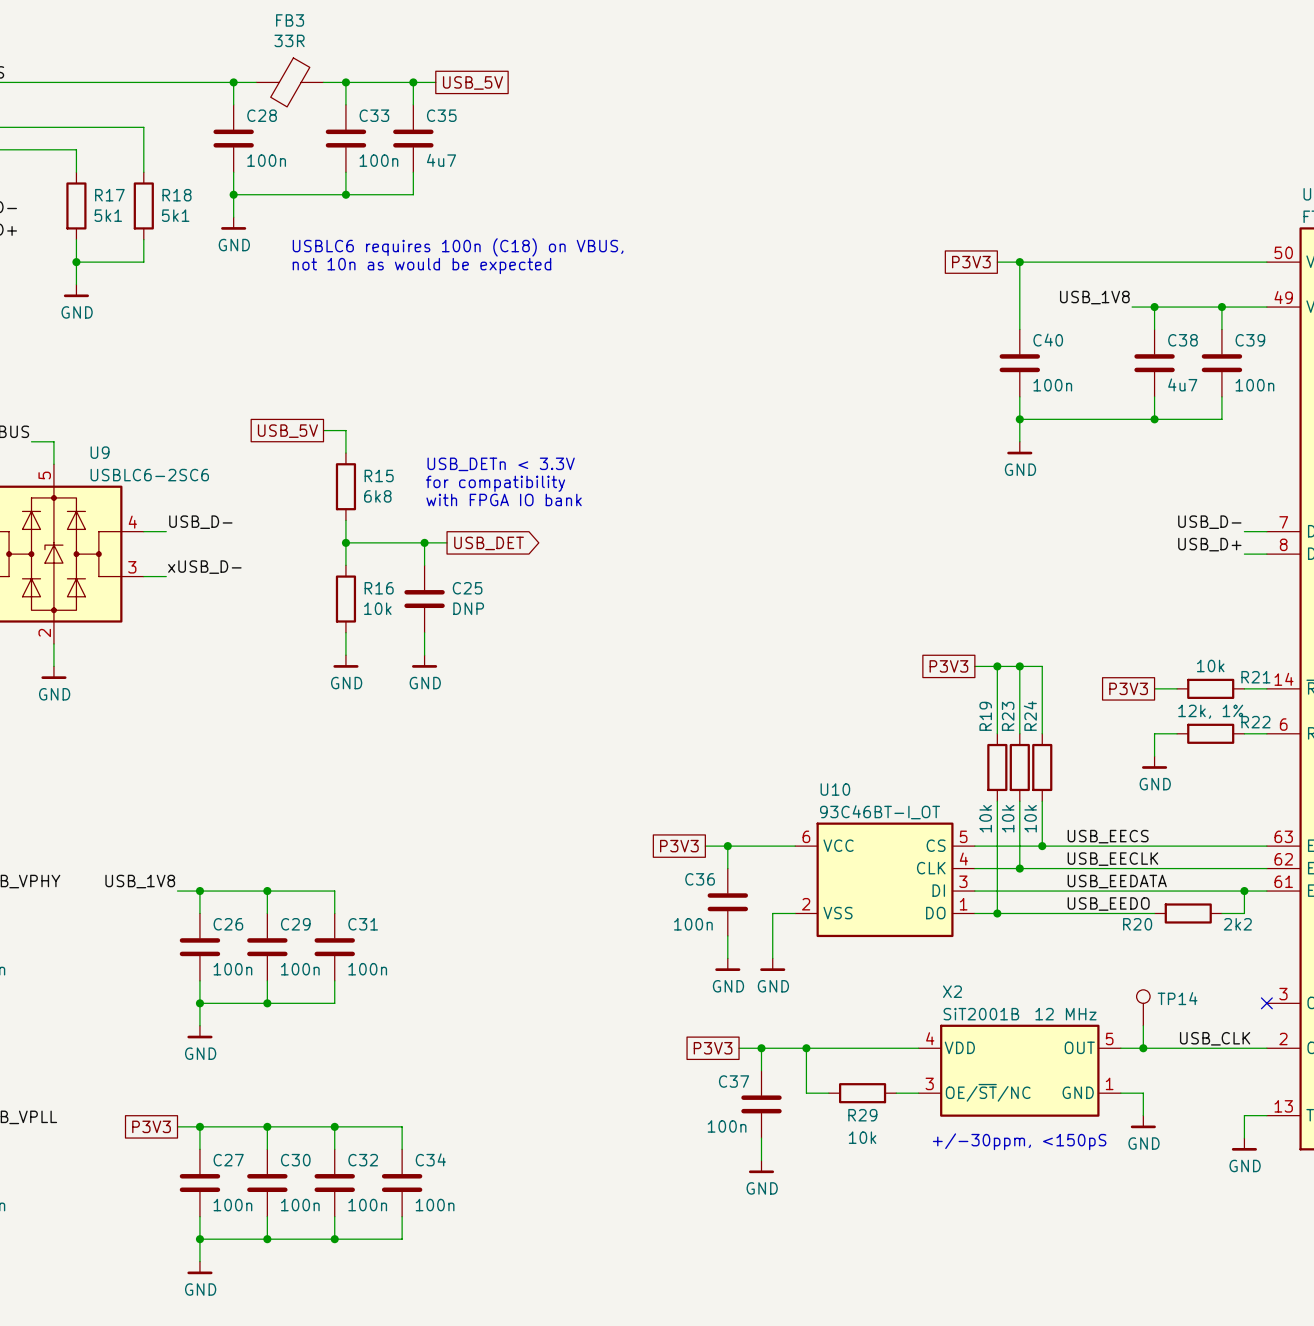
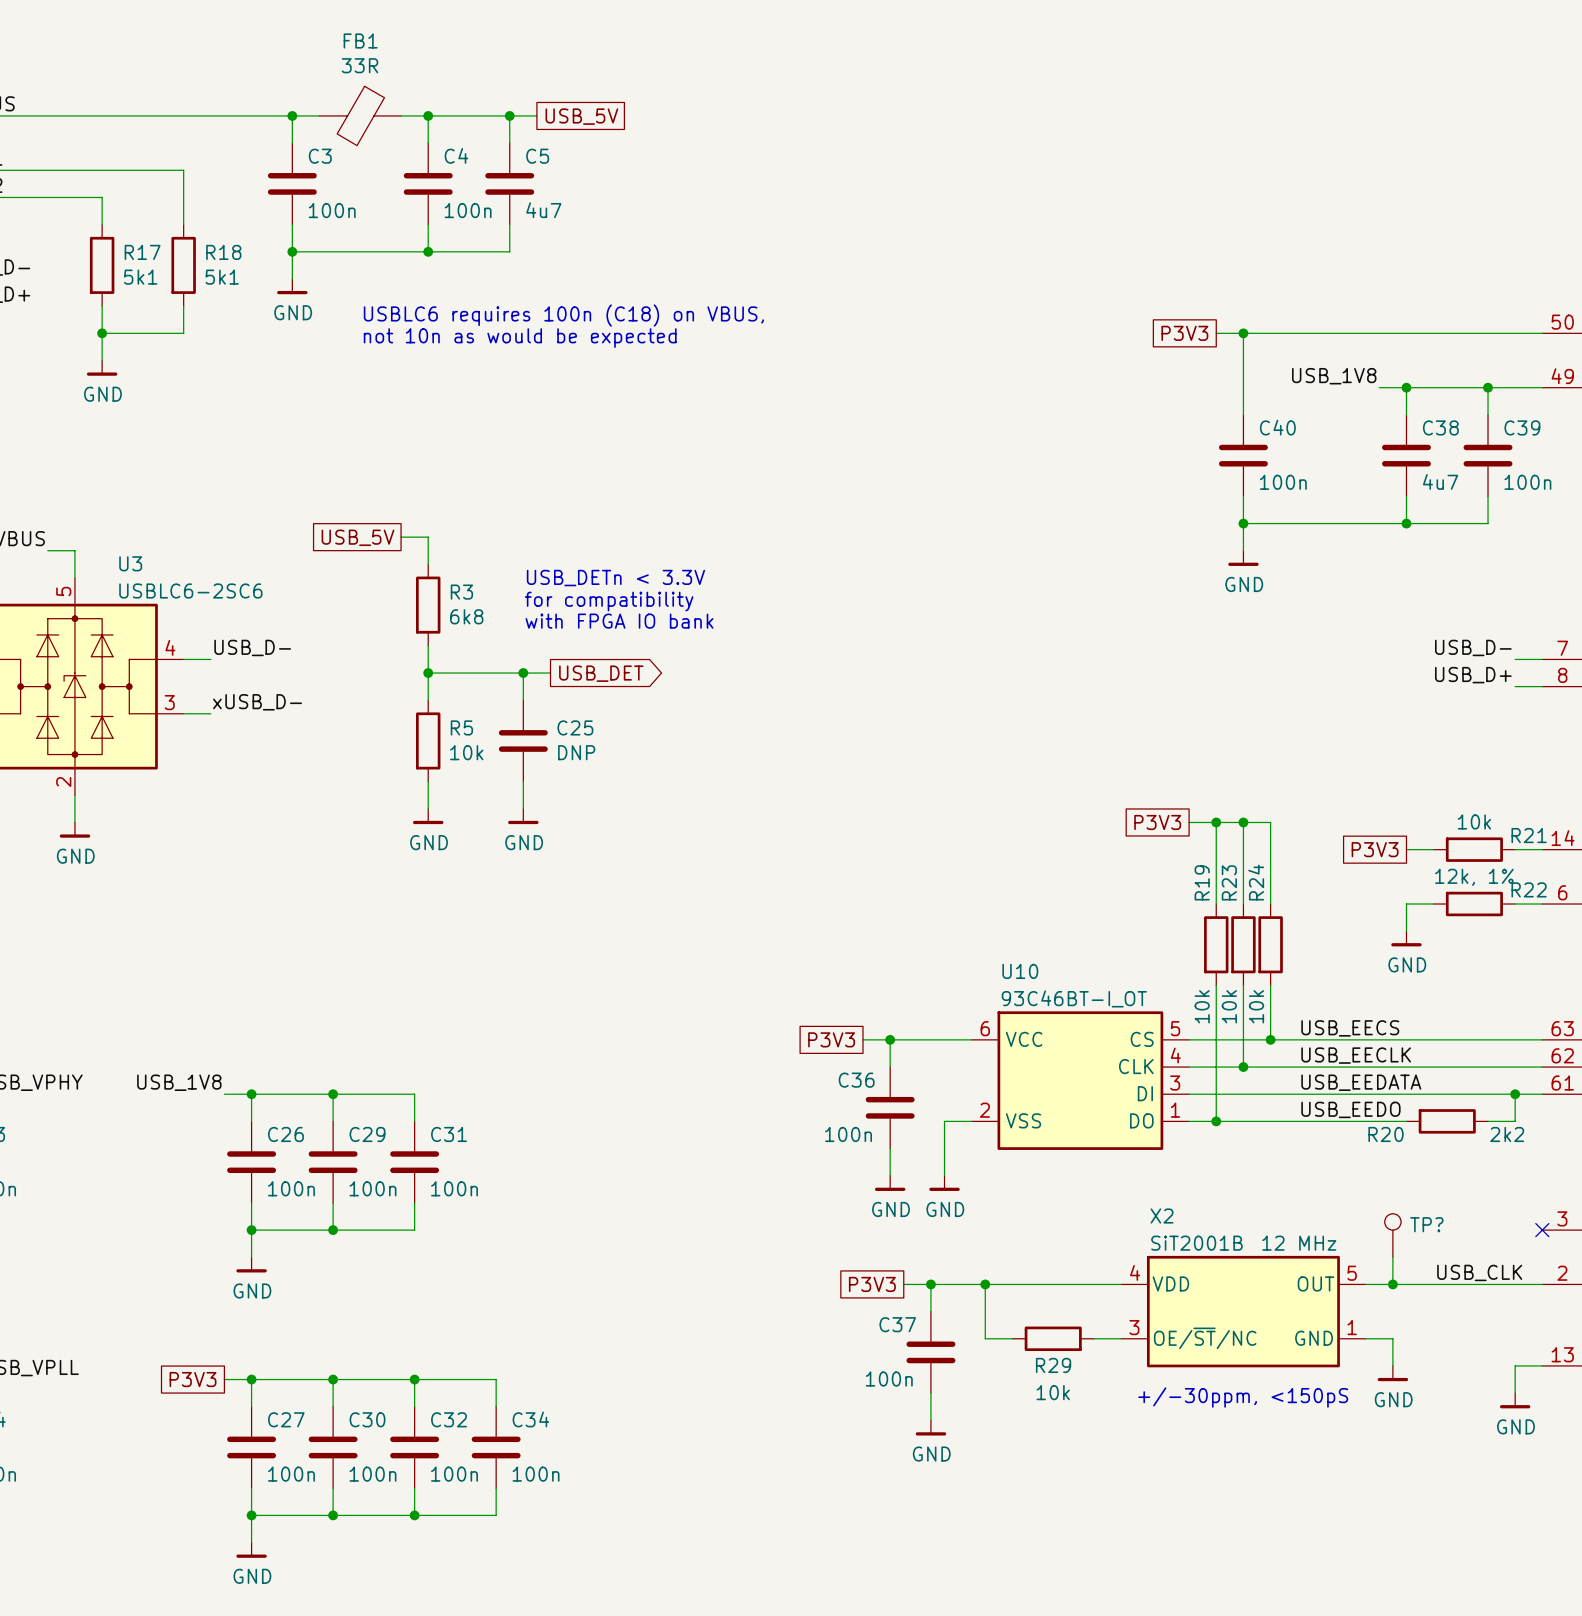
FB3 name: FB3 (290, 20) -> FB1 (360, 40)
C28 name: C28 (262, 115) -> C3 (320, 156)
C33 name: C33 (374, 115) -> C4 (456, 155)
C35 name: C35 (441, 115) -> C5 (537, 156)
U9 name: U9 (100, 452) -> U3 (130, 563)
R15 name: R15 (379, 475) -> R3 (461, 592)
R16 name: R16 (379, 588) -> R5 (461, 727)
TP14 name: TP14 (1177, 998) -> TP? (1426, 1224)

